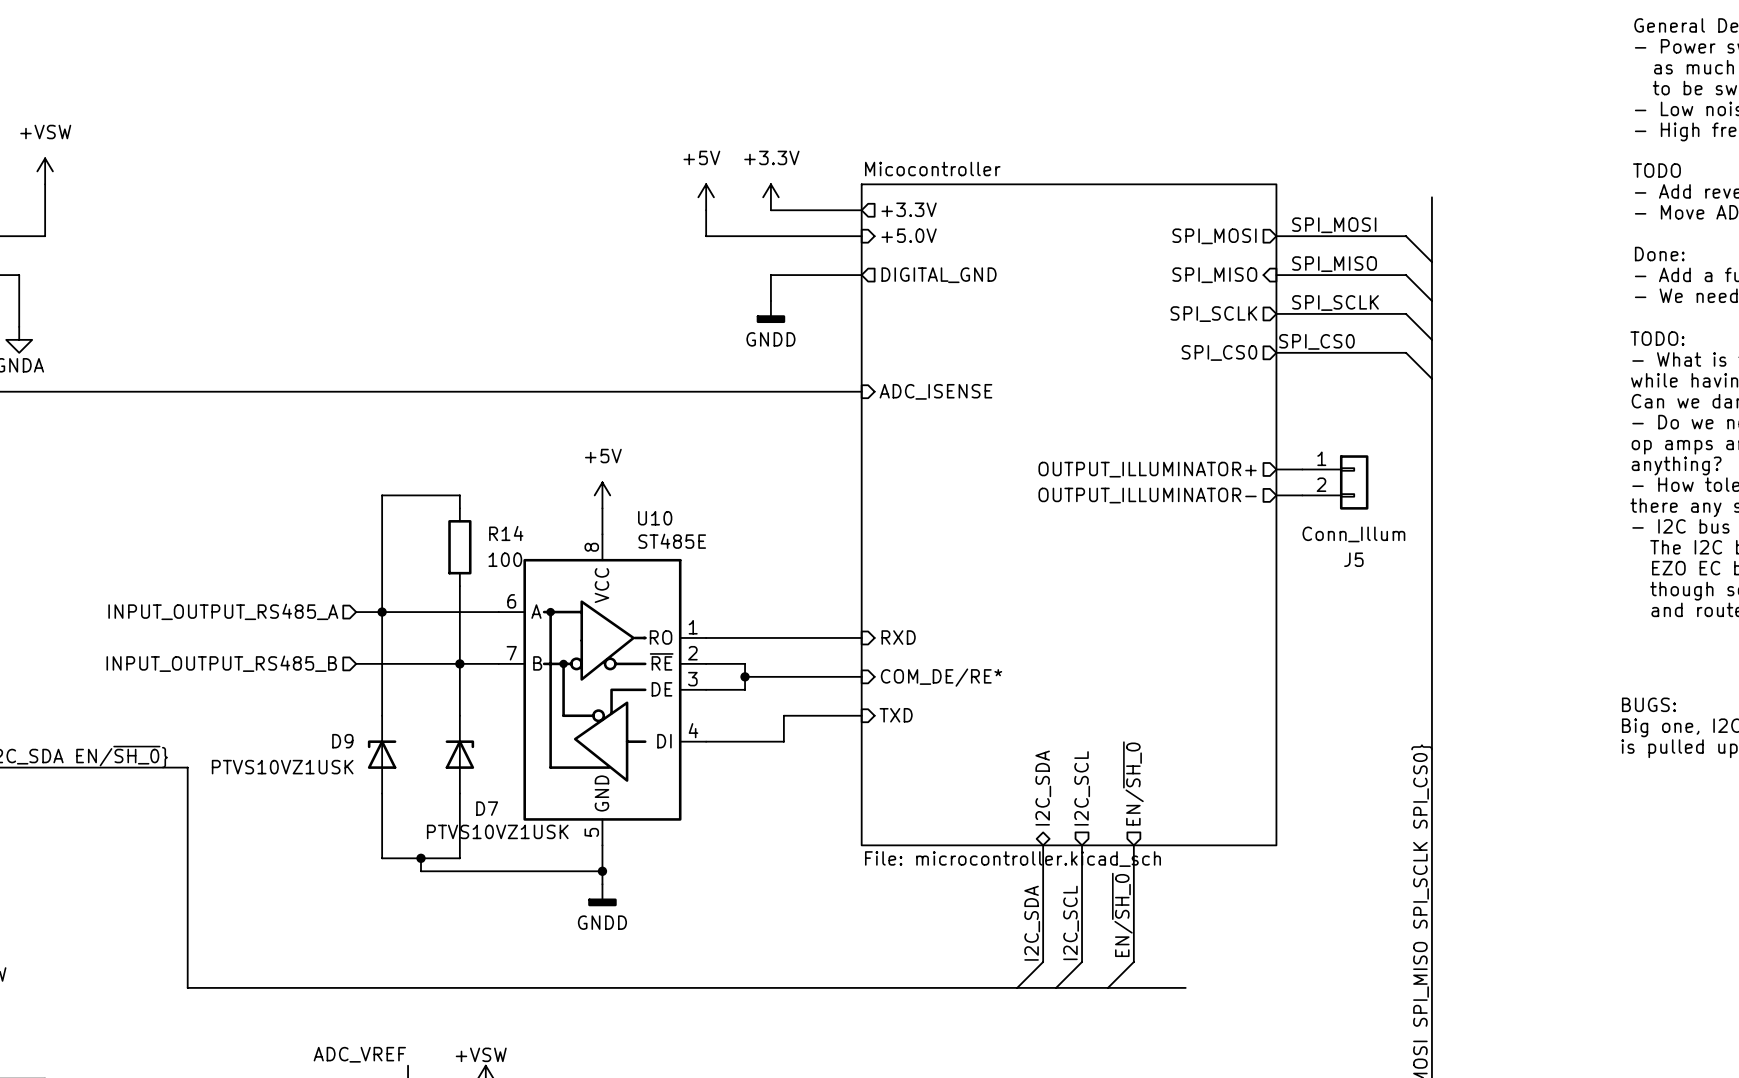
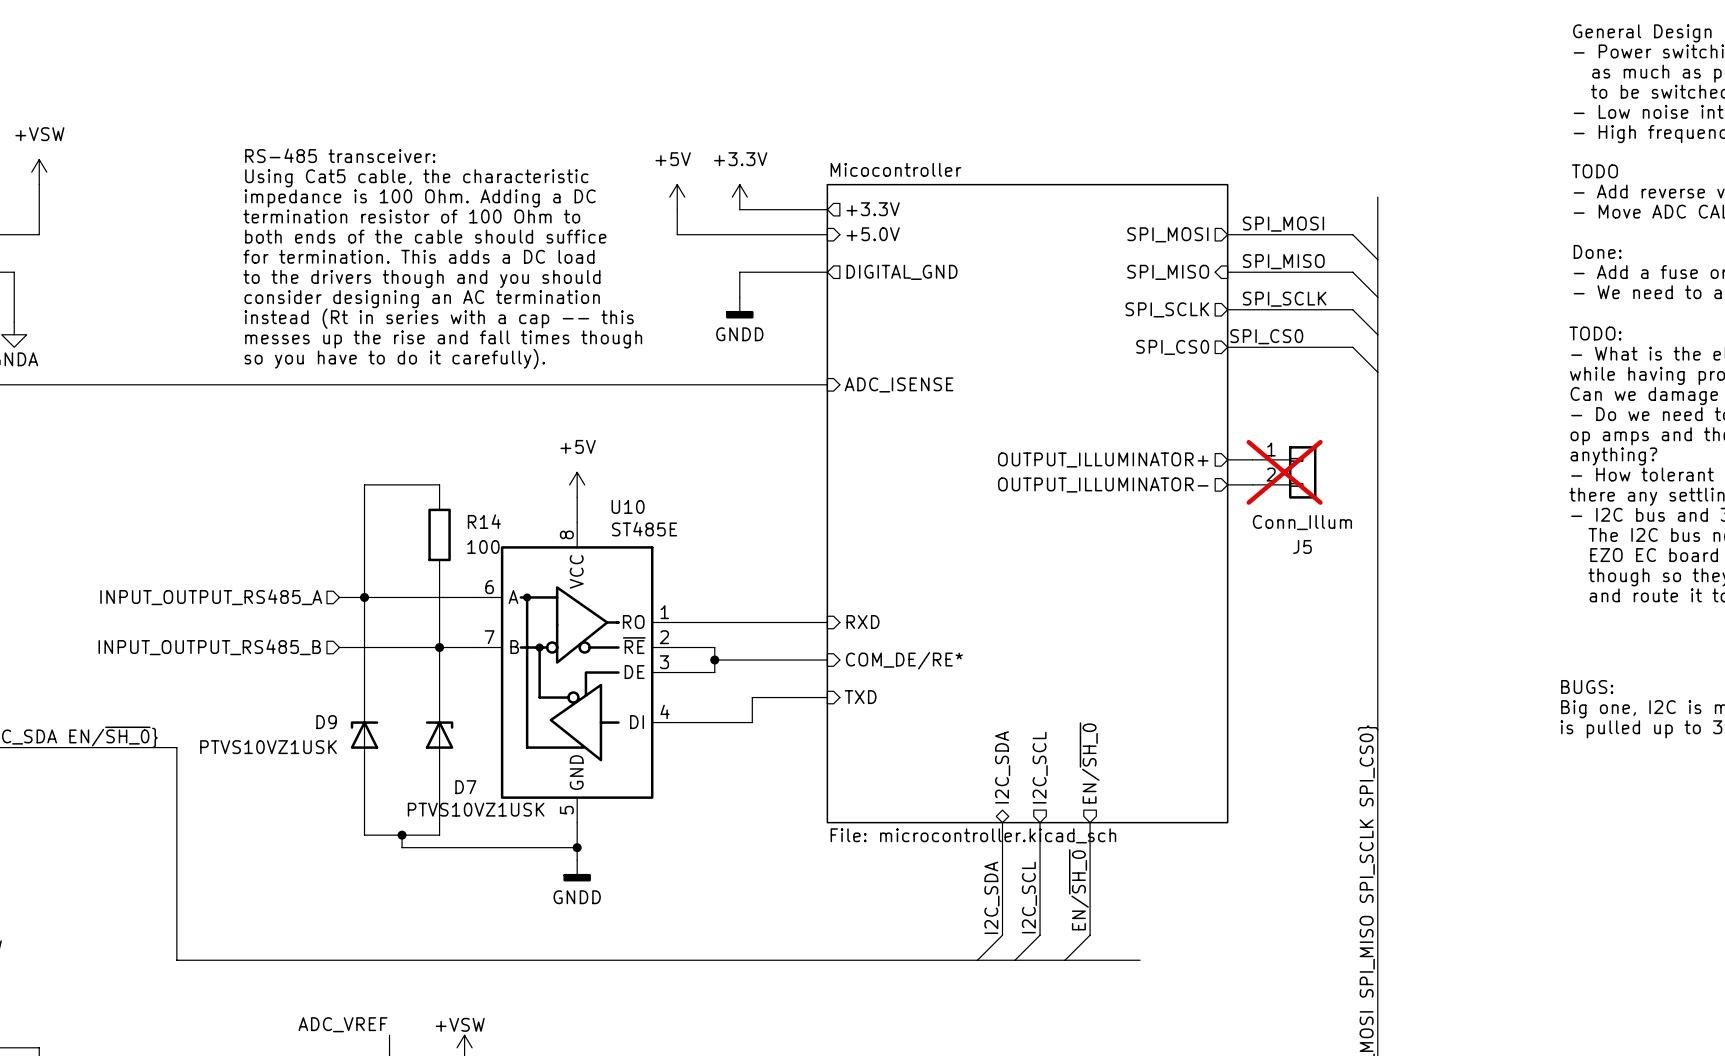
text: none -> RS-485 transceiver: (340, 155)
text: none -> Using Cat5 cable, the characteristic (416, 178)
text: none -> impedance is 100 Ohm. Adding a DC (420, 198)
text: none -> termination resistor of 100 Ohm to (411, 216)
text: none -> both ends of the cable should suffice (425, 236)
text: none -> for termination. This adds a DC load (418, 256)
text: none -> to the drivers though and you should (421, 279)
text: none -> consider designing an AC termination (422, 299)
text: none -> instead (Rt in series with a cap -- this (439, 318)
text: none -> messes up the rise and fall times though (443, 339)
text: none -> so you have to do it carefully). (394, 358)
J5 do-not-place cross: none -> (1284, 472)

